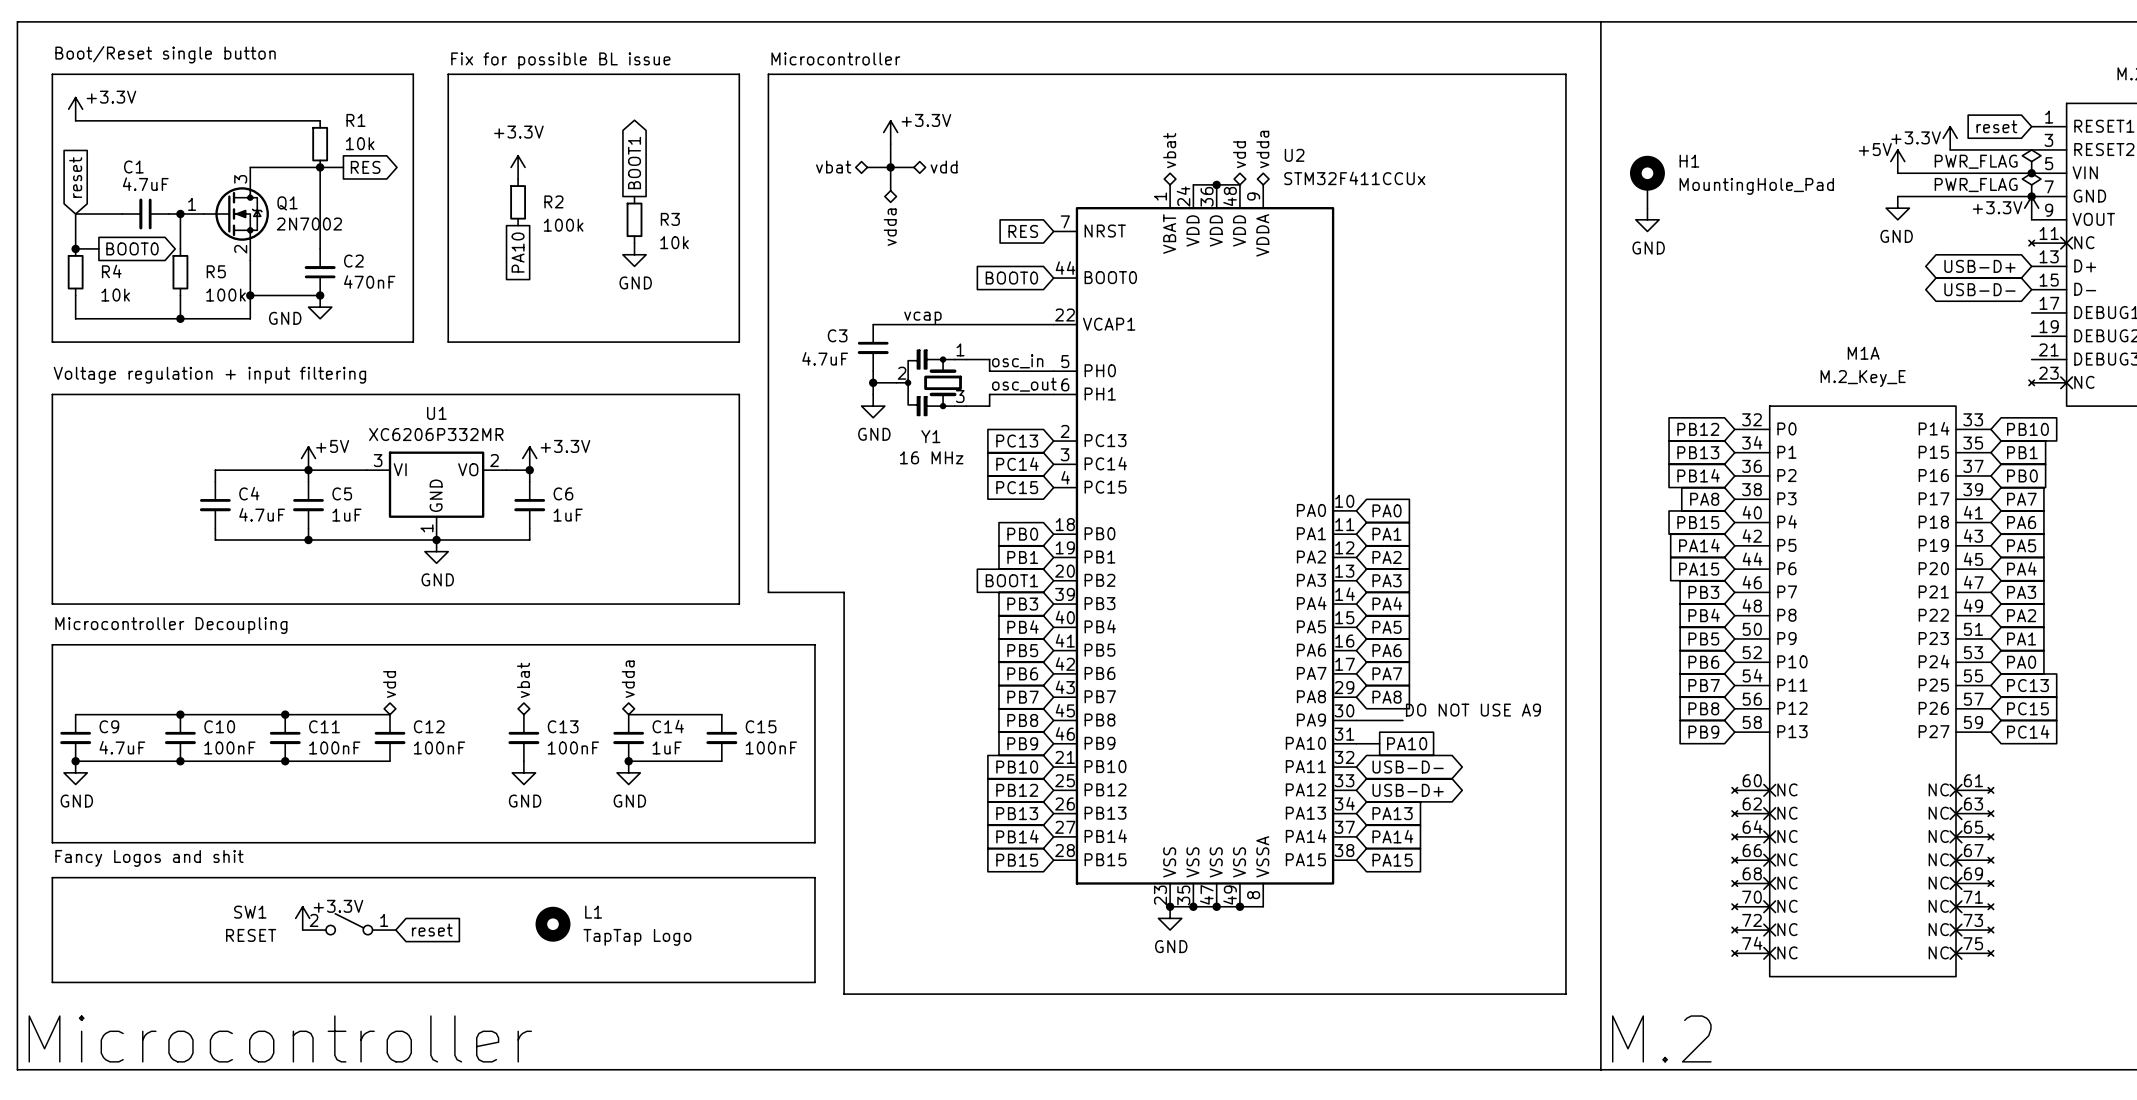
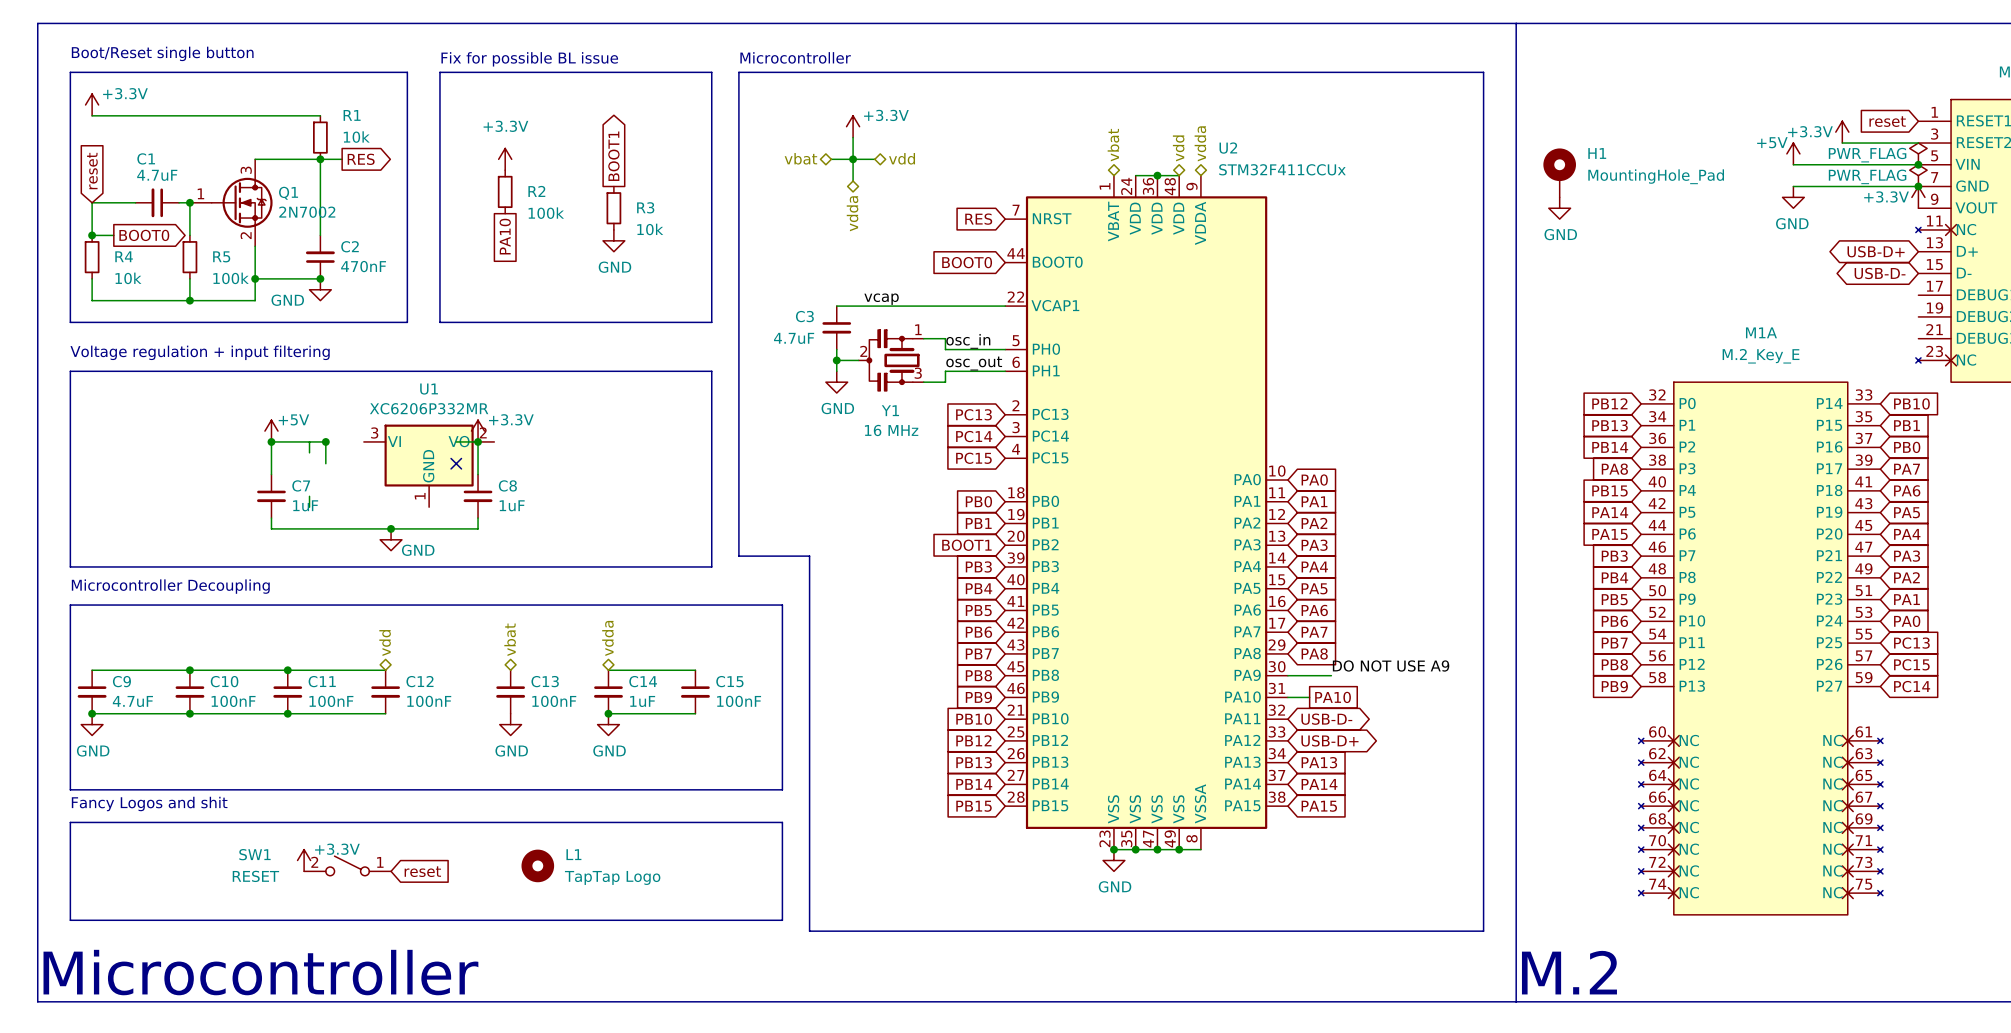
power symbol position: +5V (308, 458) -> +5V (271, 431)
power symbol position: +3.3V (529, 458) -> +3.3V (478, 431)
wire: (267, 470) (215, 470) (215, 481) -> (271, 441) (271, 474)
junction: none -> (271, 441)
junction position: (308, 470) -> (325, 441)
wire: (325, 470) (366, 470) -> (325, 441) (325, 463)
wire: none -> (456, 441) (478, 441) (478, 474)
wire: (506, 470) (529, 470) (529, 481) -> none
junction position: (529, 470) -> (478, 441)
no-connect mark: none -> (456, 463)
C4: 4.7uF (215, 505) -> none
C5: 1uF (308, 505) -> none
C6: 1uF (529, 505) -> none
wire: (215, 528) (215, 540) (529, 540) (529, 528) -> none
C7: none -> 1uF (271, 496)
C8: none -> 1uF (478, 496)
junction: (308, 540) -> none
junction: (436, 540) -> none
wire: none -> (271, 518) (271, 528) (478, 528) (478, 518)
power symbol position: GND (436, 551) -> GND (391, 539)
junction: none -> (391, 528)
power symbol text position: GND (437, 579) -> GND (418, 550)

